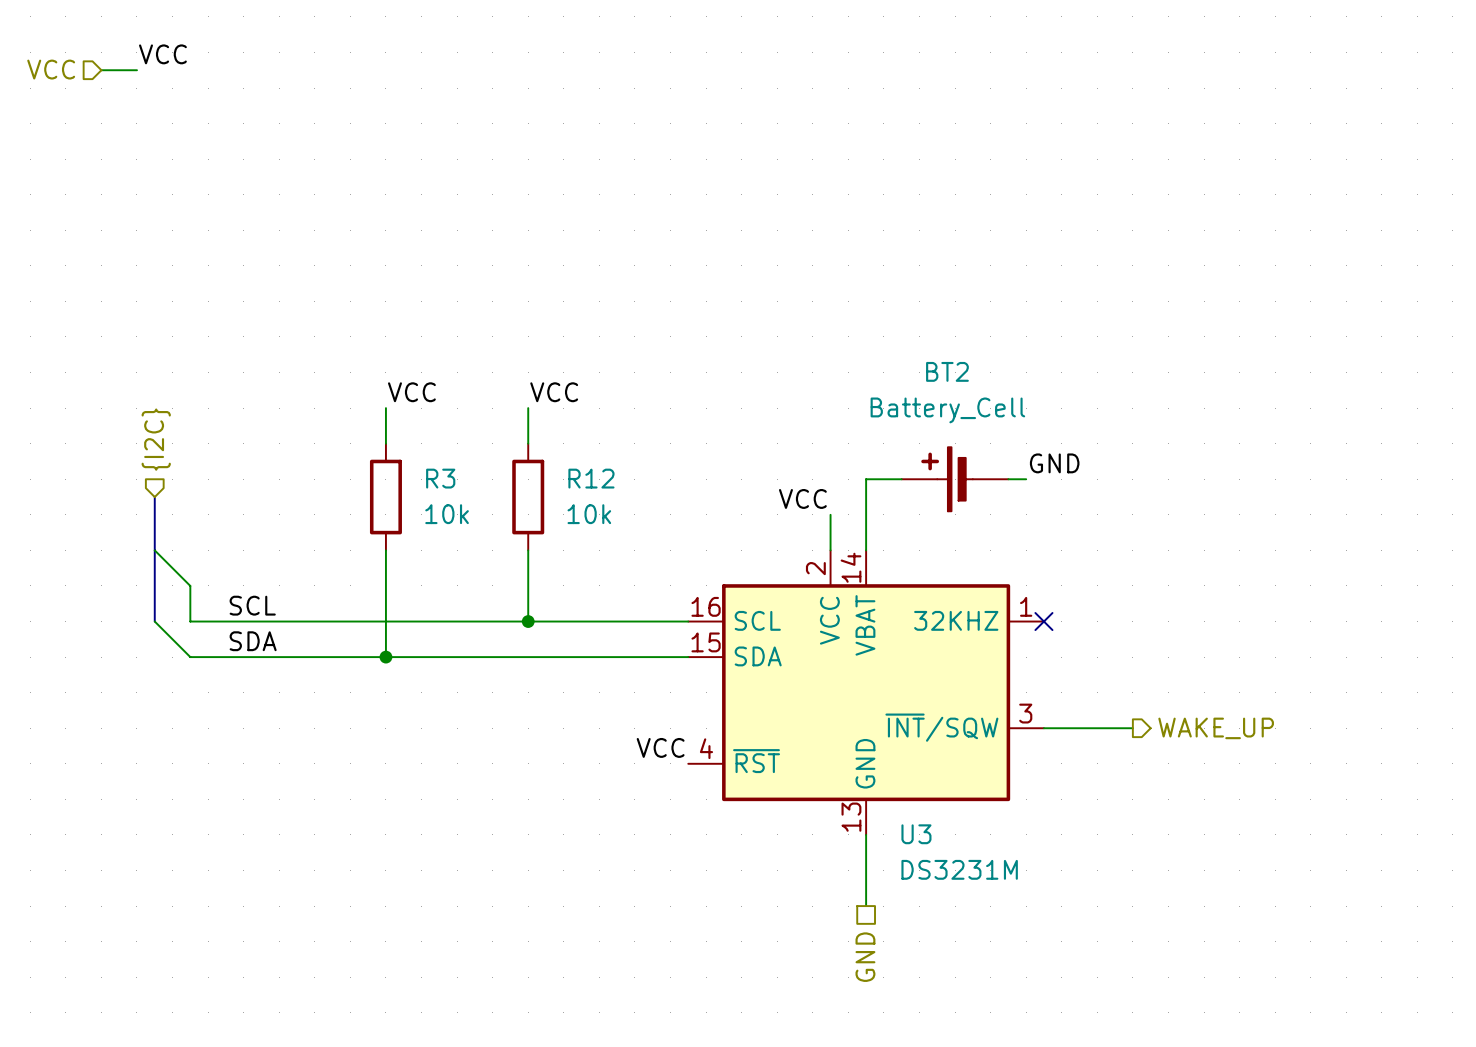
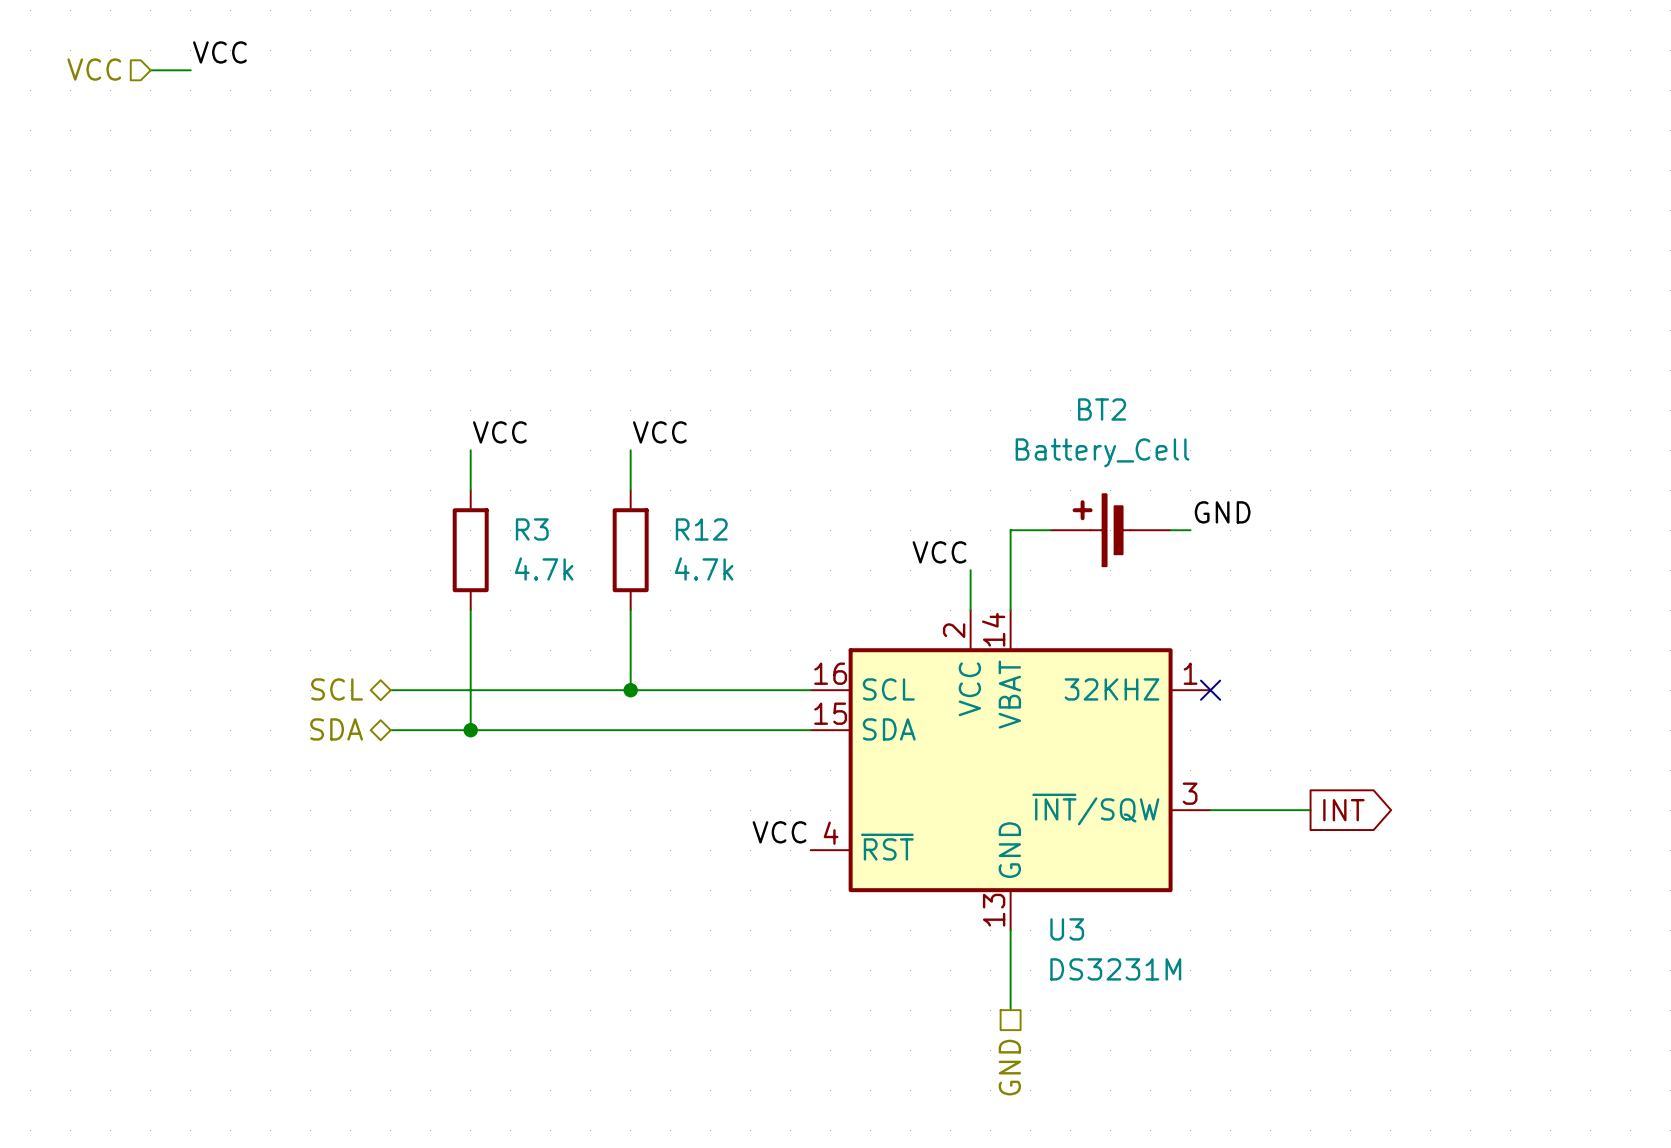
hierarchical label: {I2C} (156, 439) -> none
bus: (154, 497) (154, 621) -> none
R3 value: 10k (447, 514) -> 4.7k (544, 568)
R12 value: 10k (589, 514) -> 4.7k (704, 568)
wire: (154, 550) (190, 585) (190, 621) (314, 621) -> none
label: SCL (252, 605) -> none
hierarchical label: none -> SCL (337, 689)
wire: (154, 621) (190, 657) (314, 657) -> none
label: SDA (253, 641) -> none
hierarchical label: none -> SDA (336, 729)
global label: none -> INT (1343, 810)
hierarchical label: WAKE_UP (1216, 728) -> none

